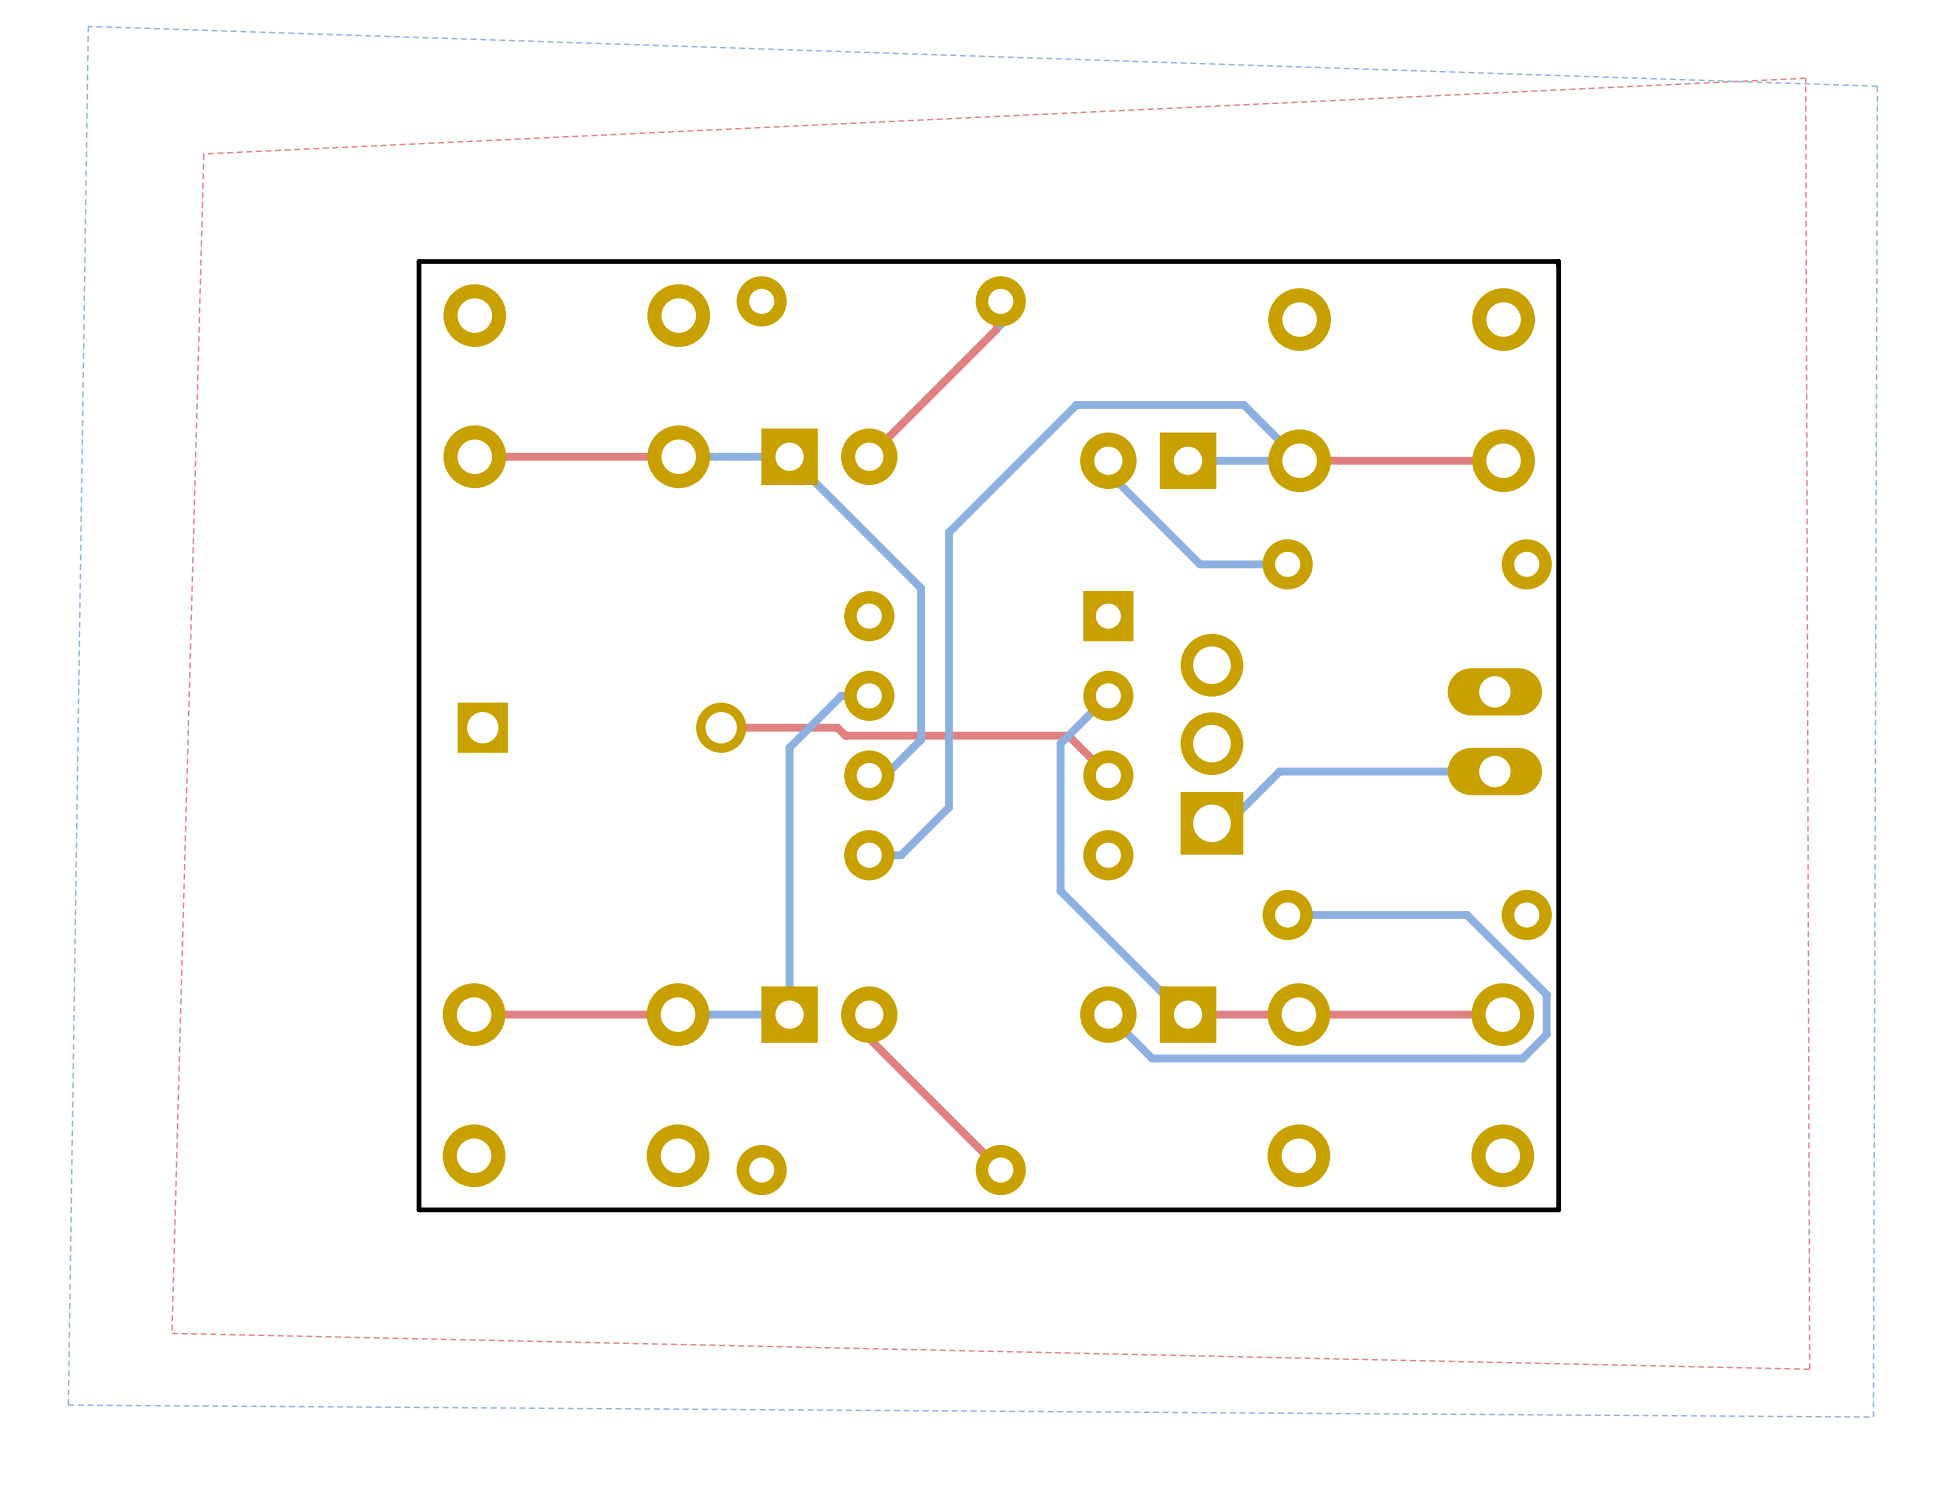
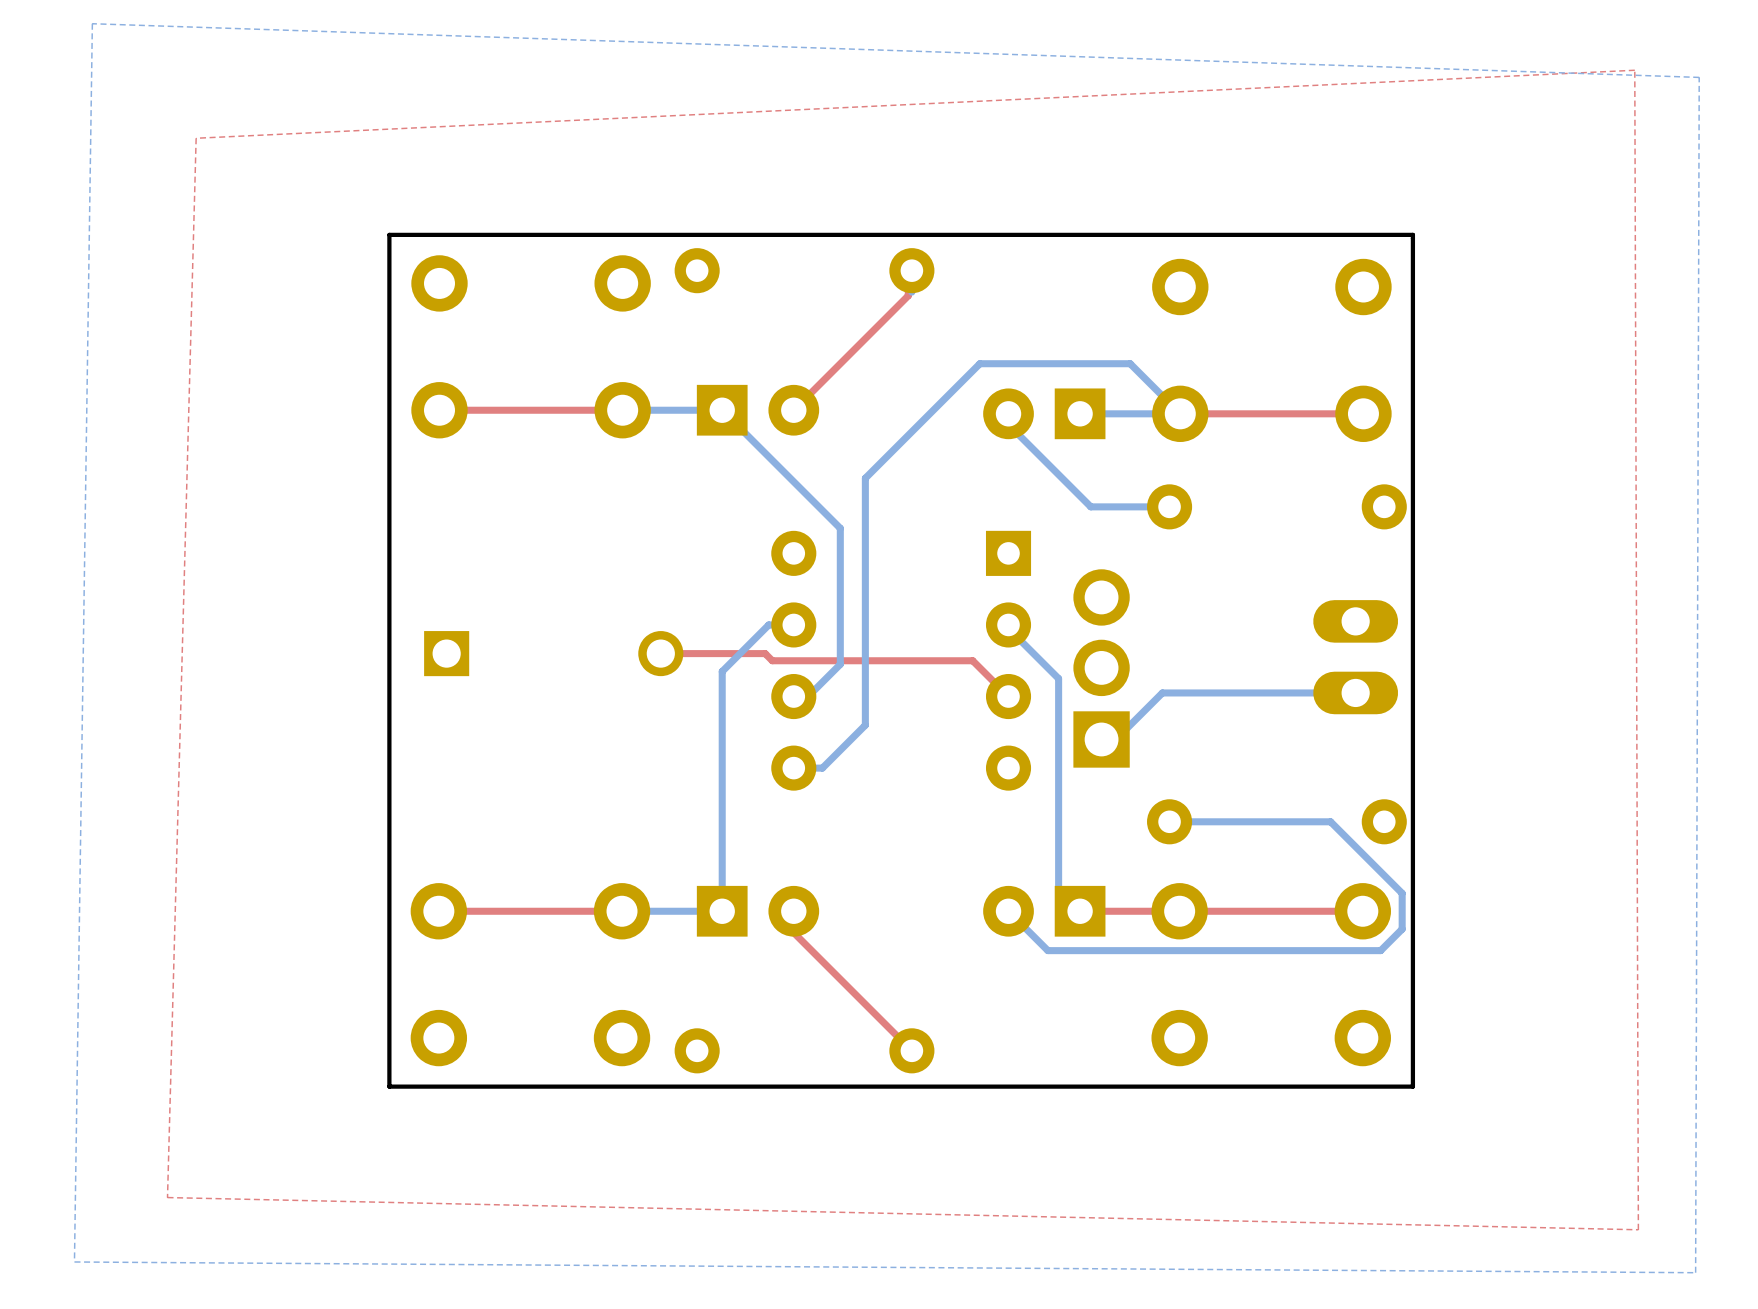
bottom track: (1108, 695) (1060, 743) (1060, 891) (1184, 1014) (1188, 1014) -> none
bottom track: none -> (1008, 628) (1058, 678) (1058, 889)

